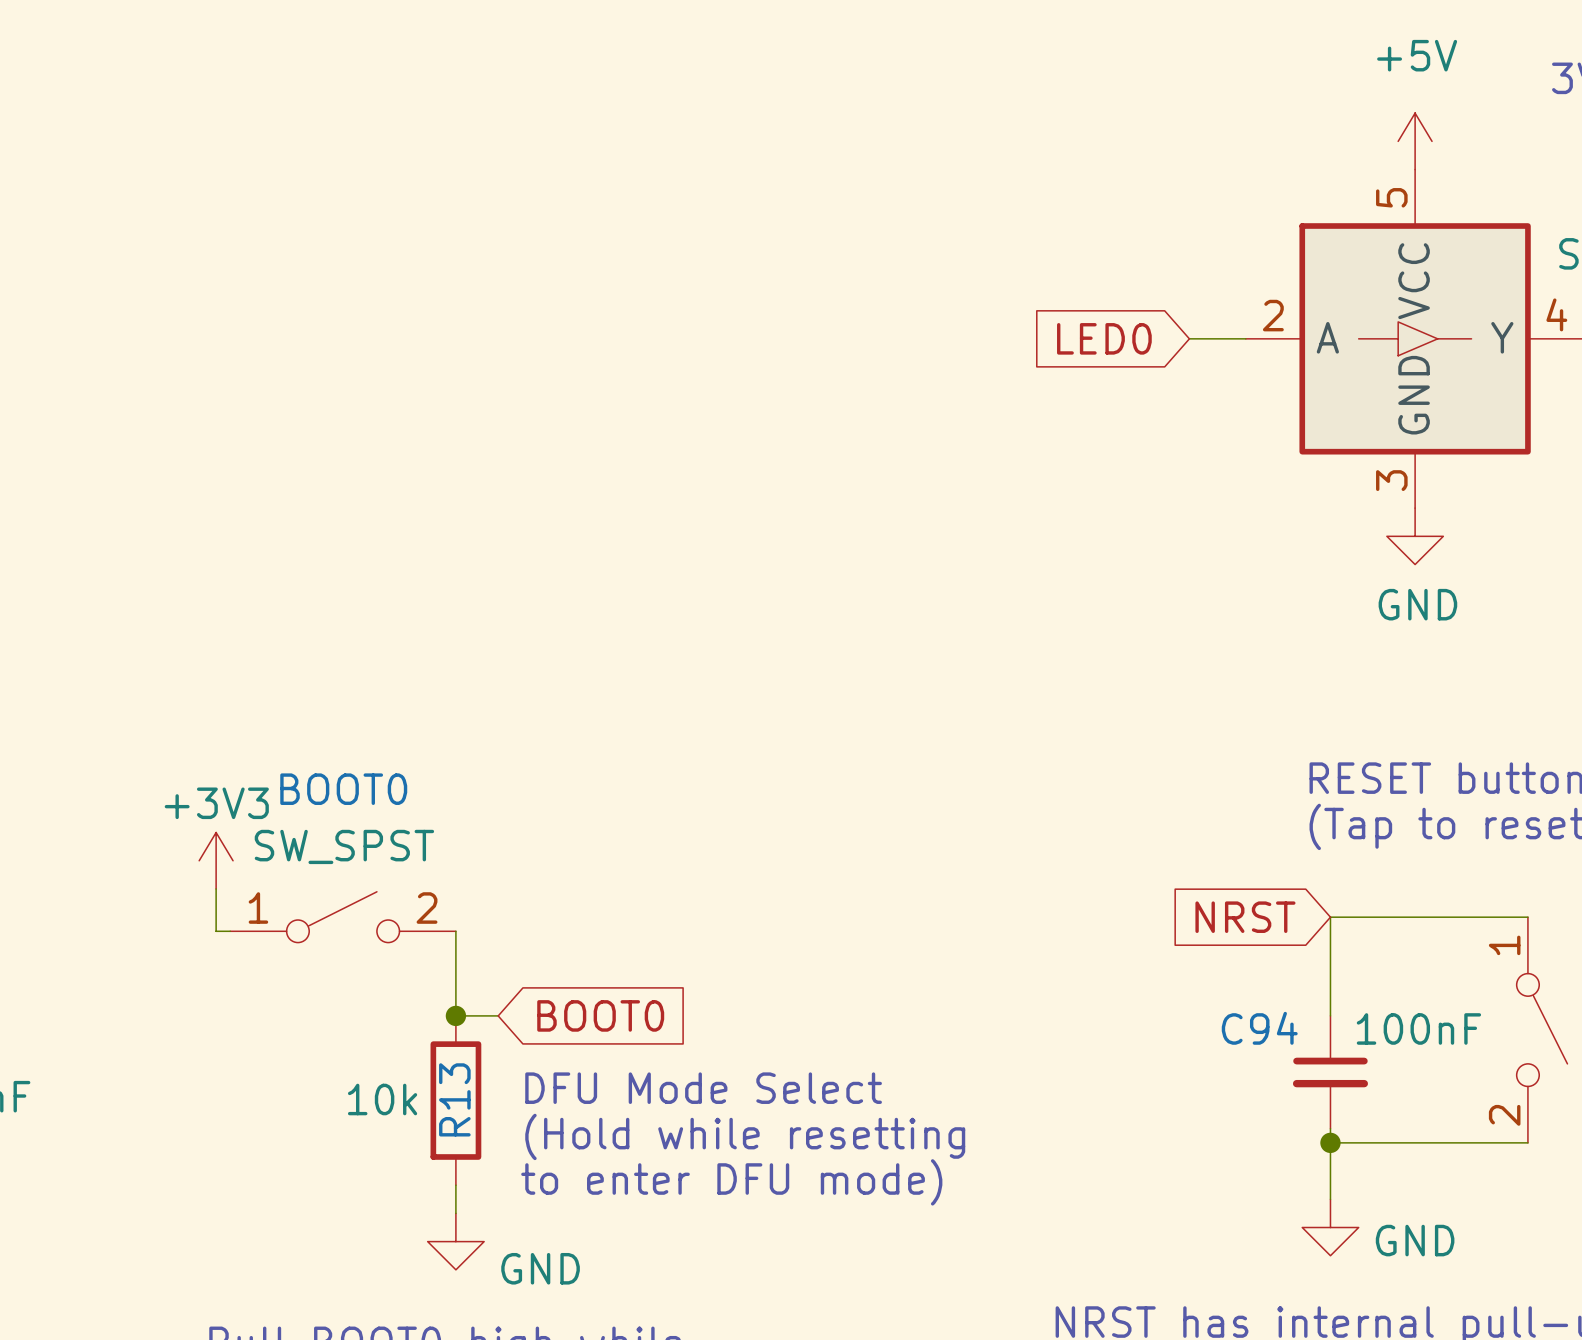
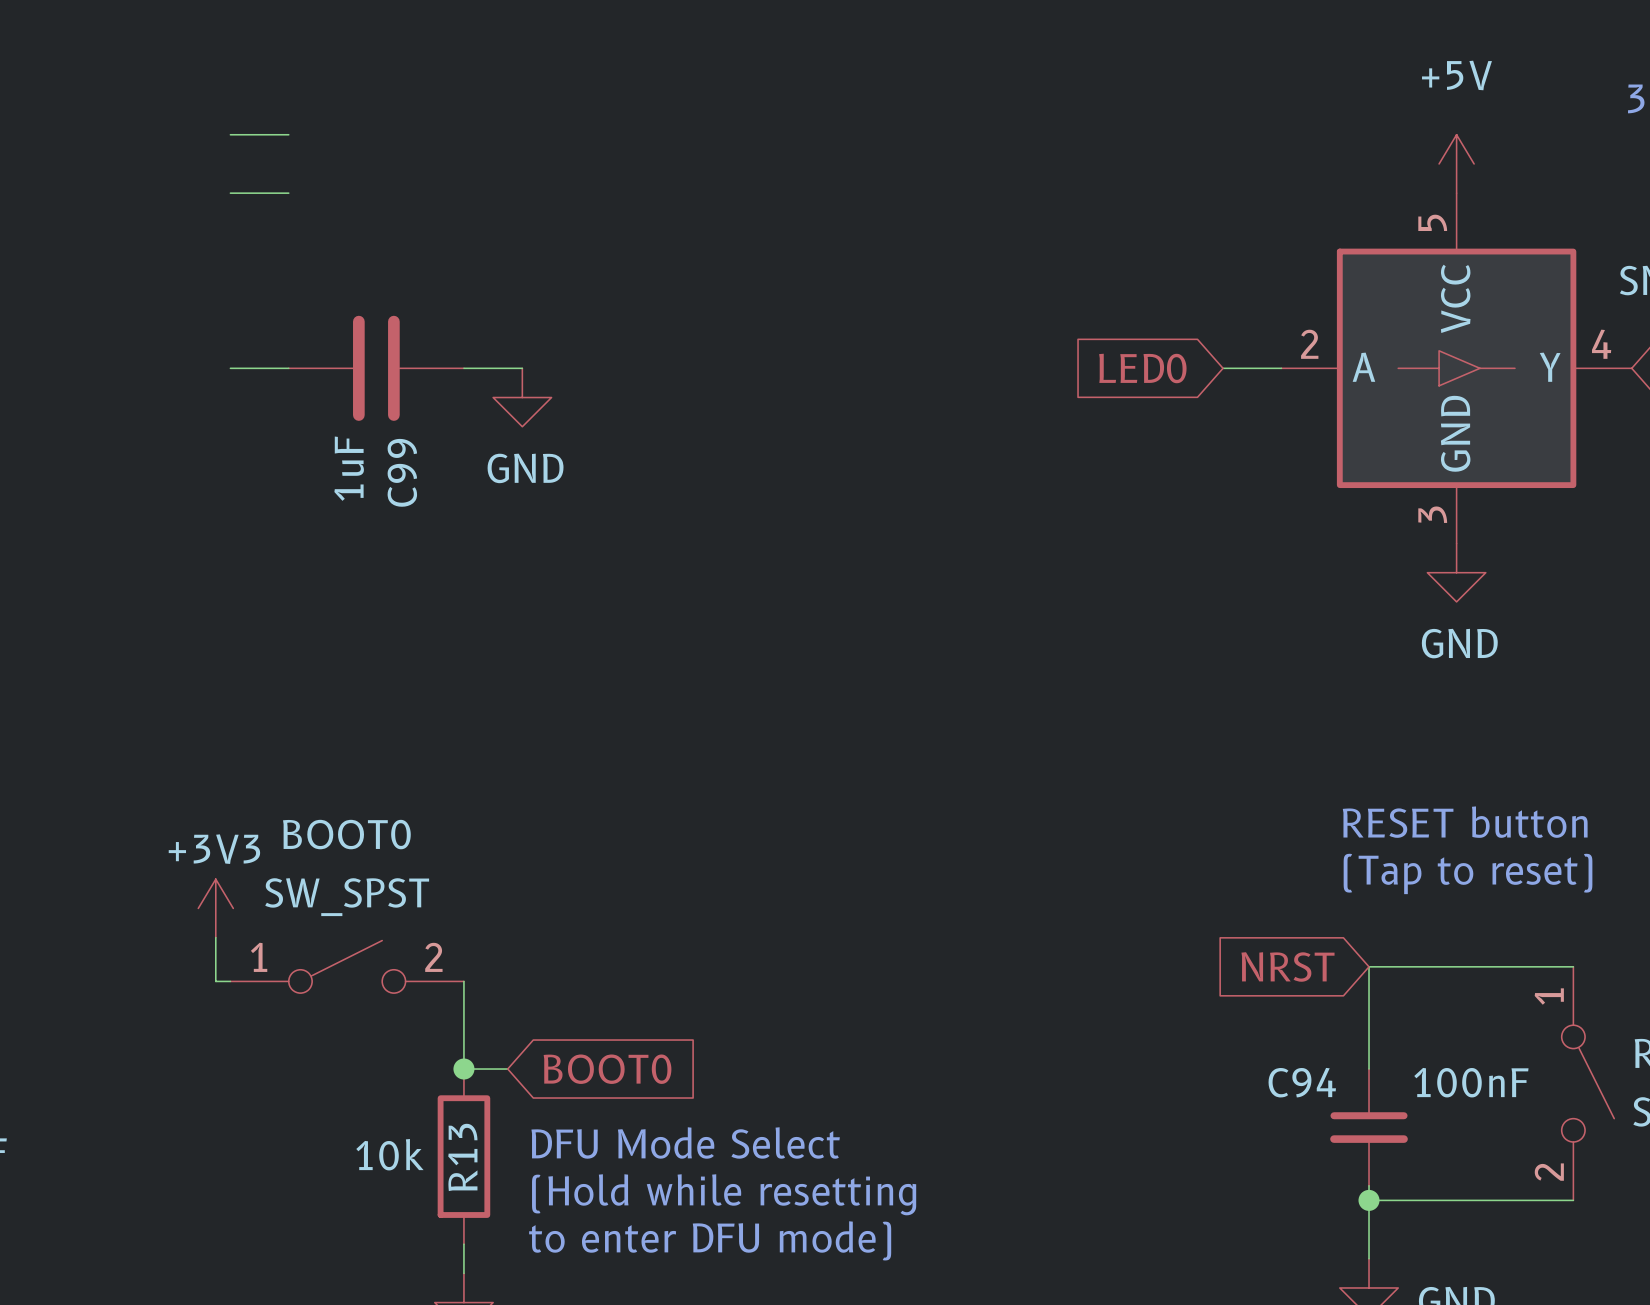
wire: none -> (230, 134) (288, 134)
wire: none -> (230, 193) (288, 193)
wire: none -> (230, 368) (288, 368)
C99: none -> 1uF (376, 368)
wire: none -> (463, 368) (522, 368)
power symbol: none -> GND (522, 397)

